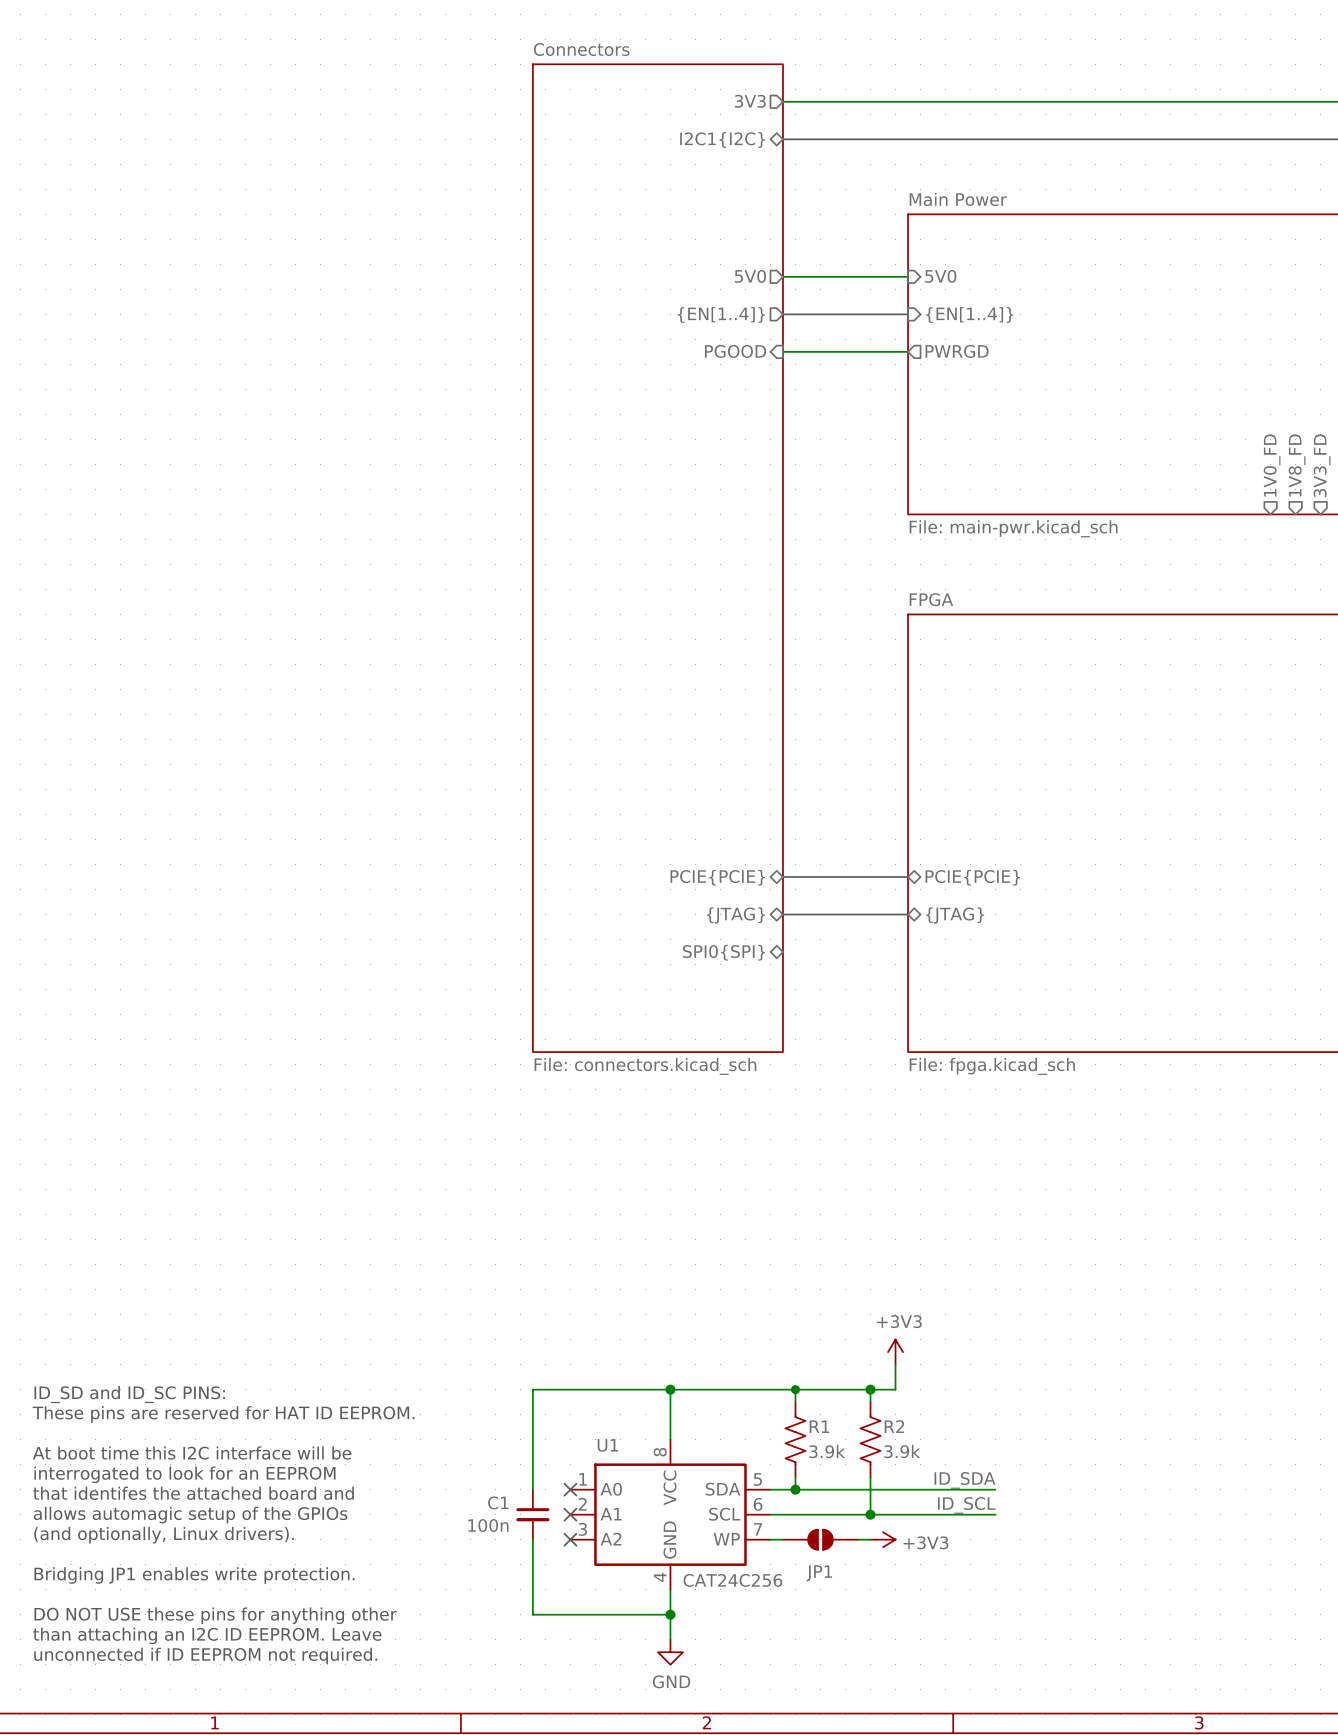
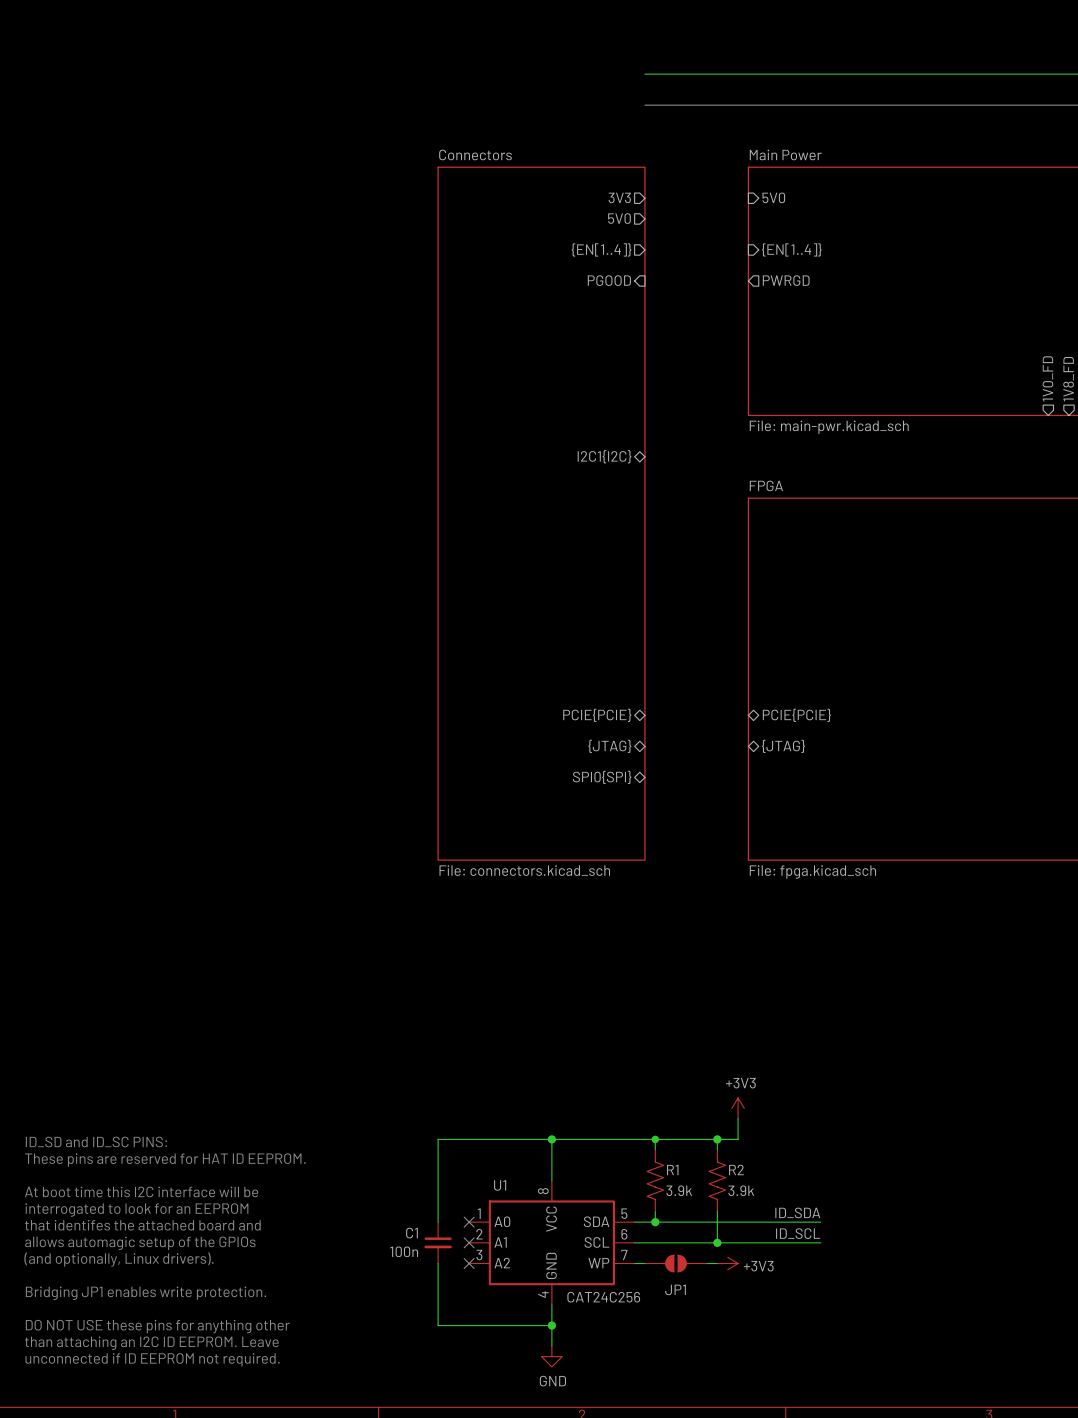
sheet pin position: 3V3 (750, 101) -> 3V3 (619, 197)
sheet pin: I2C1{I2C} (722, 139) -> none
wire: (782, 276) (908, 276) -> none
sheet pin position: 5V0 (940, 276) -> 5V0 (773, 197)
bus: (782, 314) (908, 314) -> none
wire: (782, 351) (908, 351) -> none
sheet Connectors: File: connectors.kicad_sch (657, 558) -> none
sheet pin: none -> I2C1{I2C} (604, 456)
sheet Connectors: none -> File: connectors.kicad_sch (541, 513)
bus: (782, 877) (908, 877) -> none
bus: (782, 914) (908, 914) -> none

